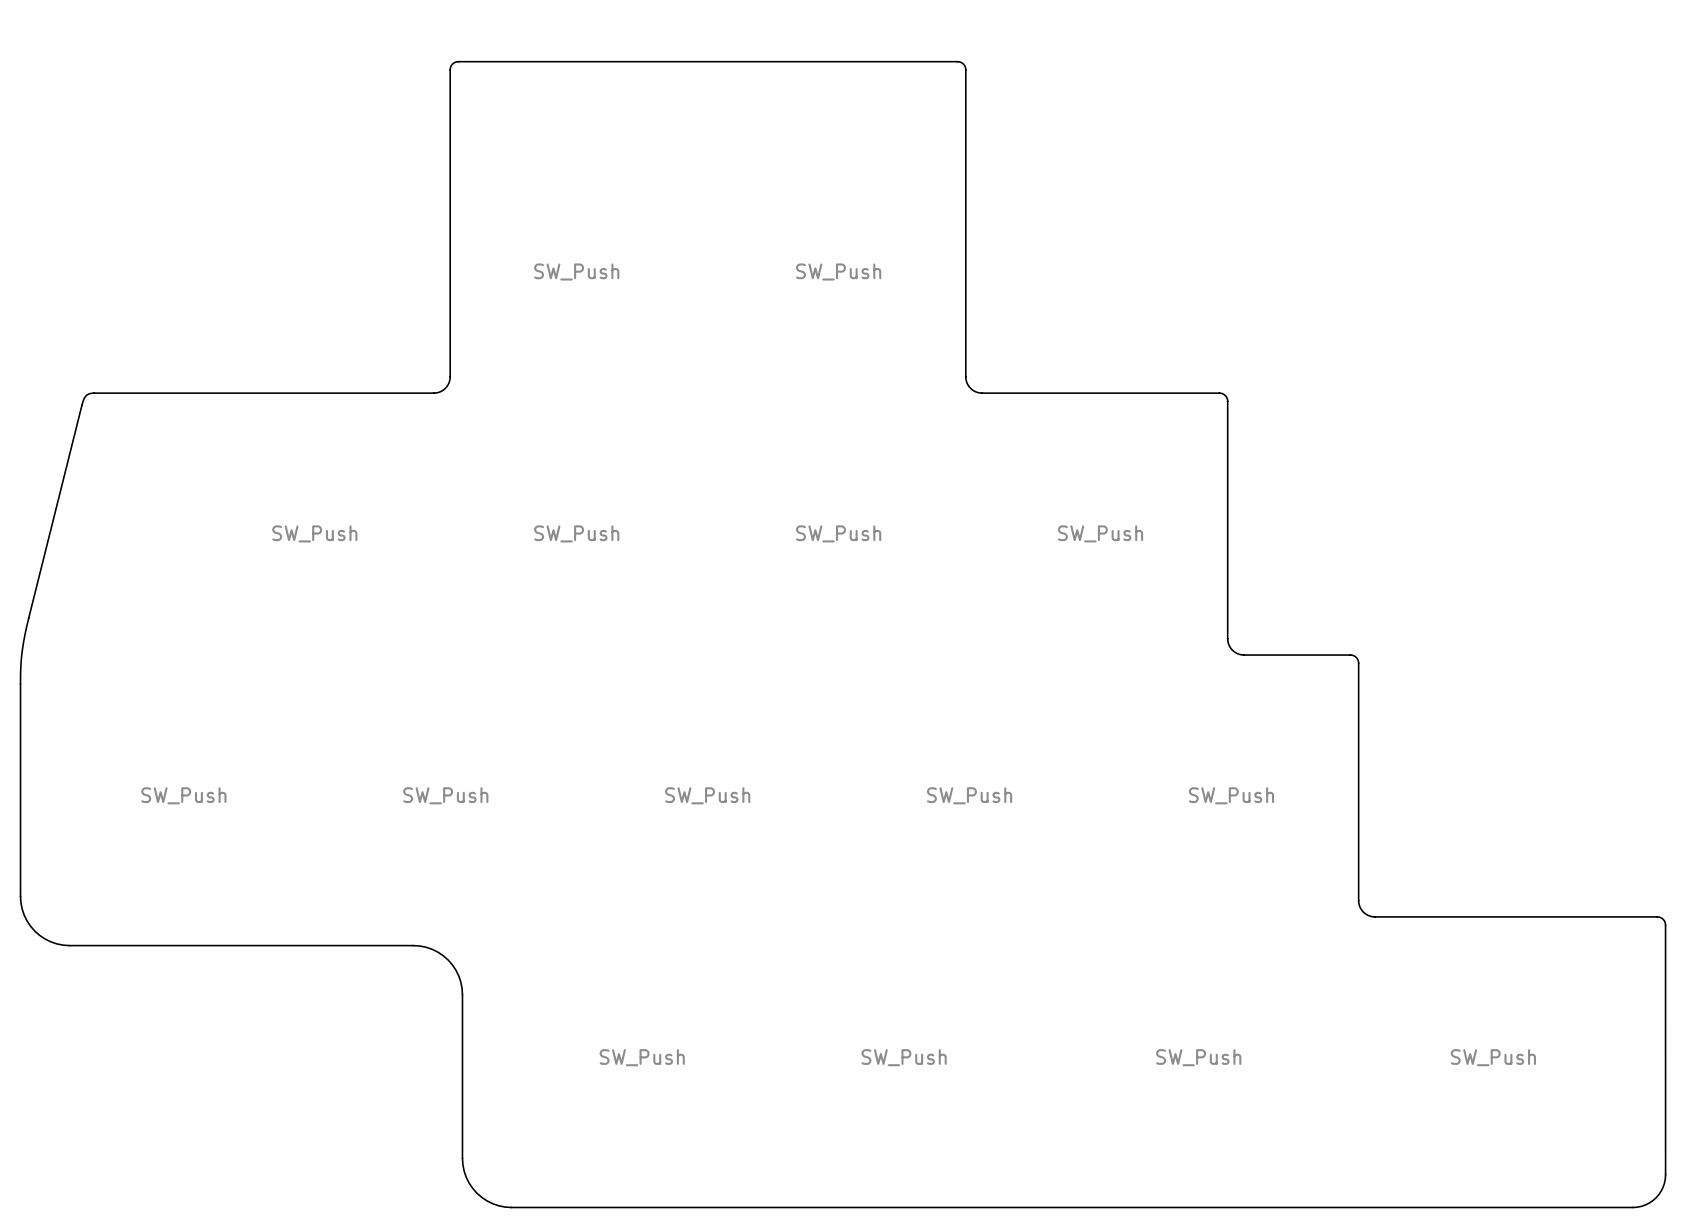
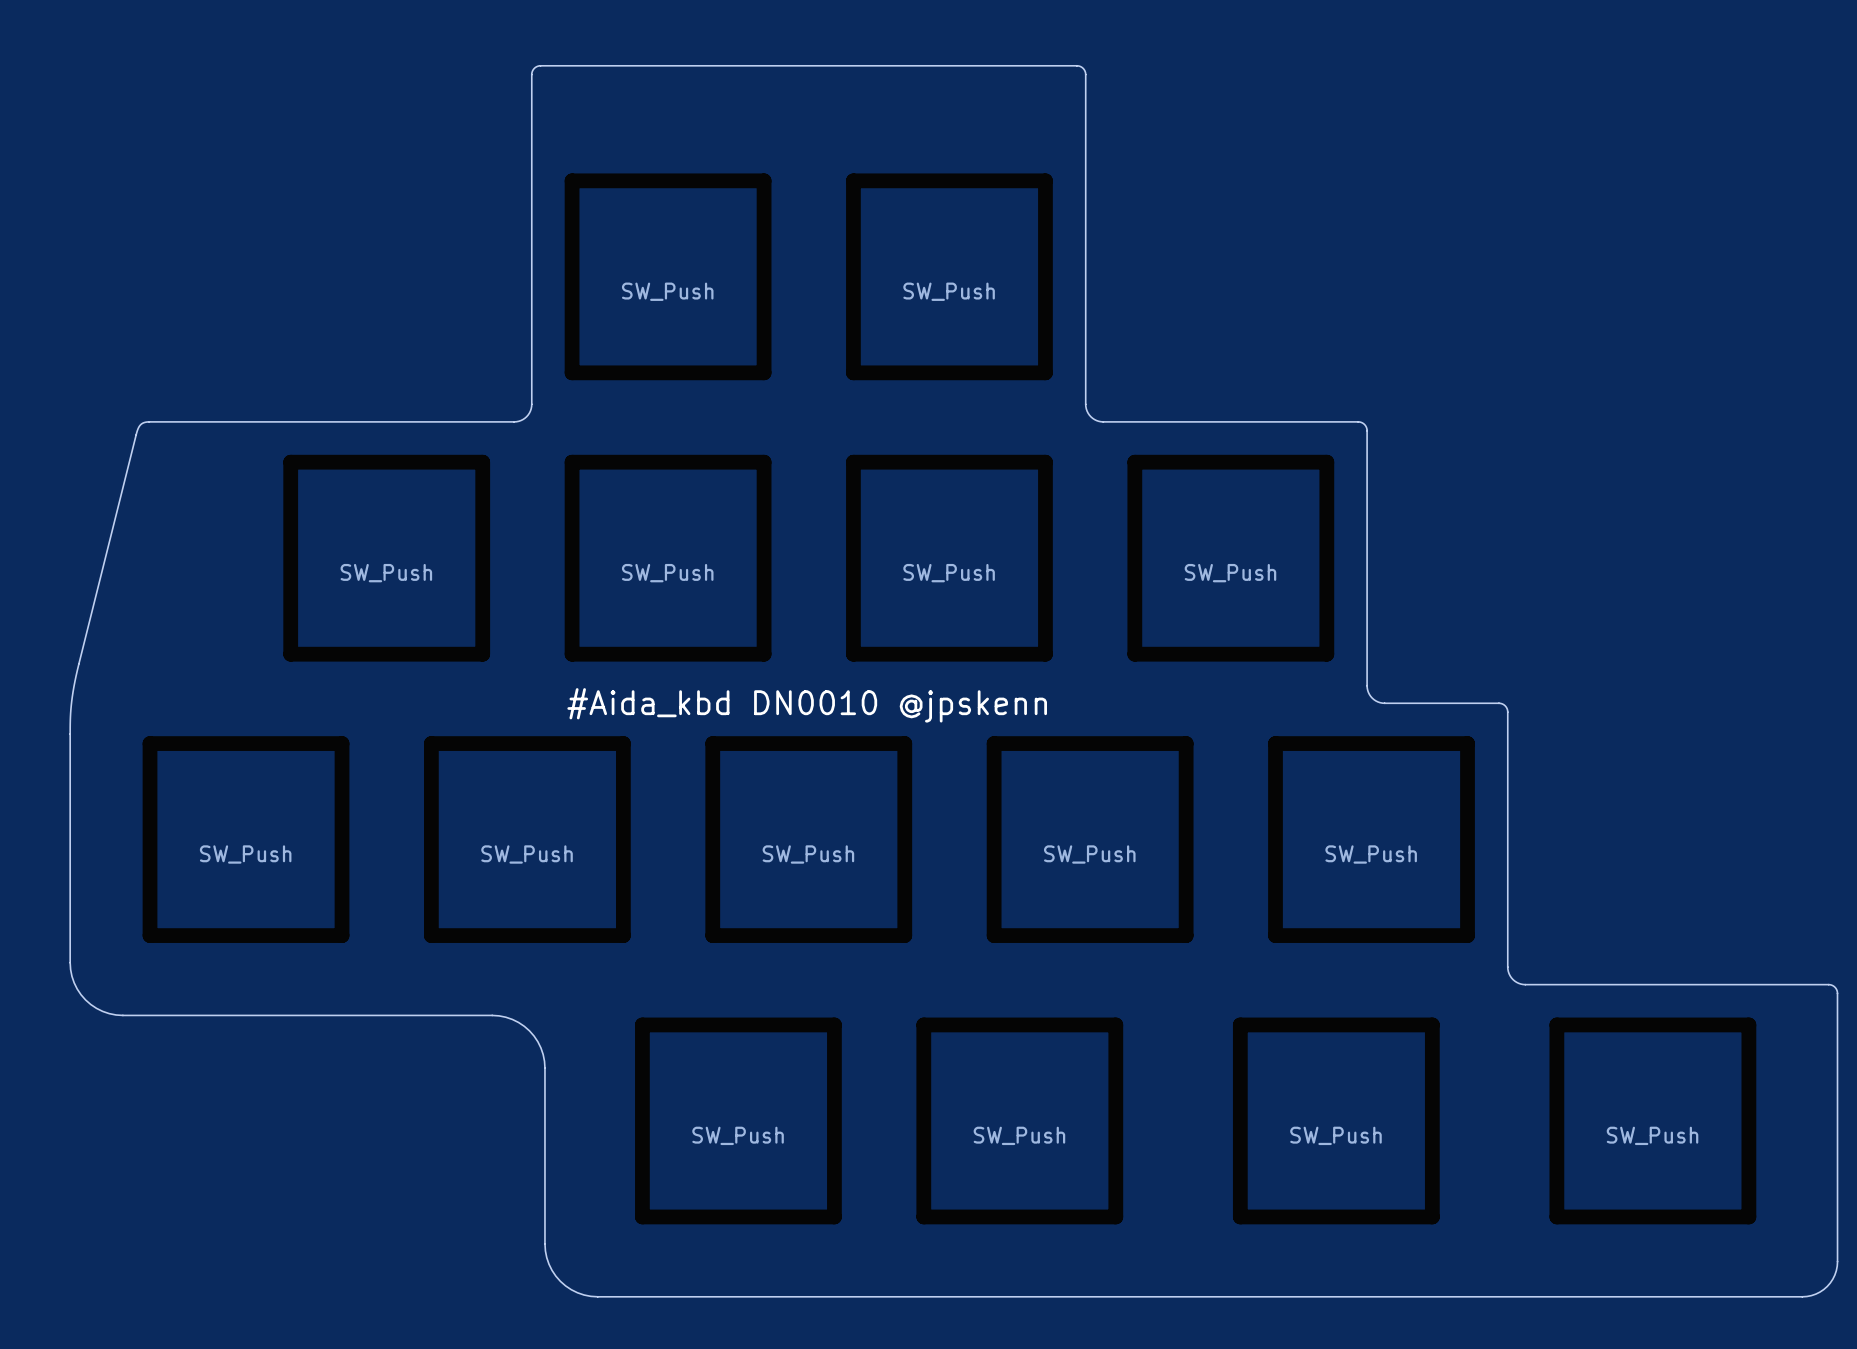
text: none -> #Aida_kbd DN0010 @jpskenn (807, 705)

